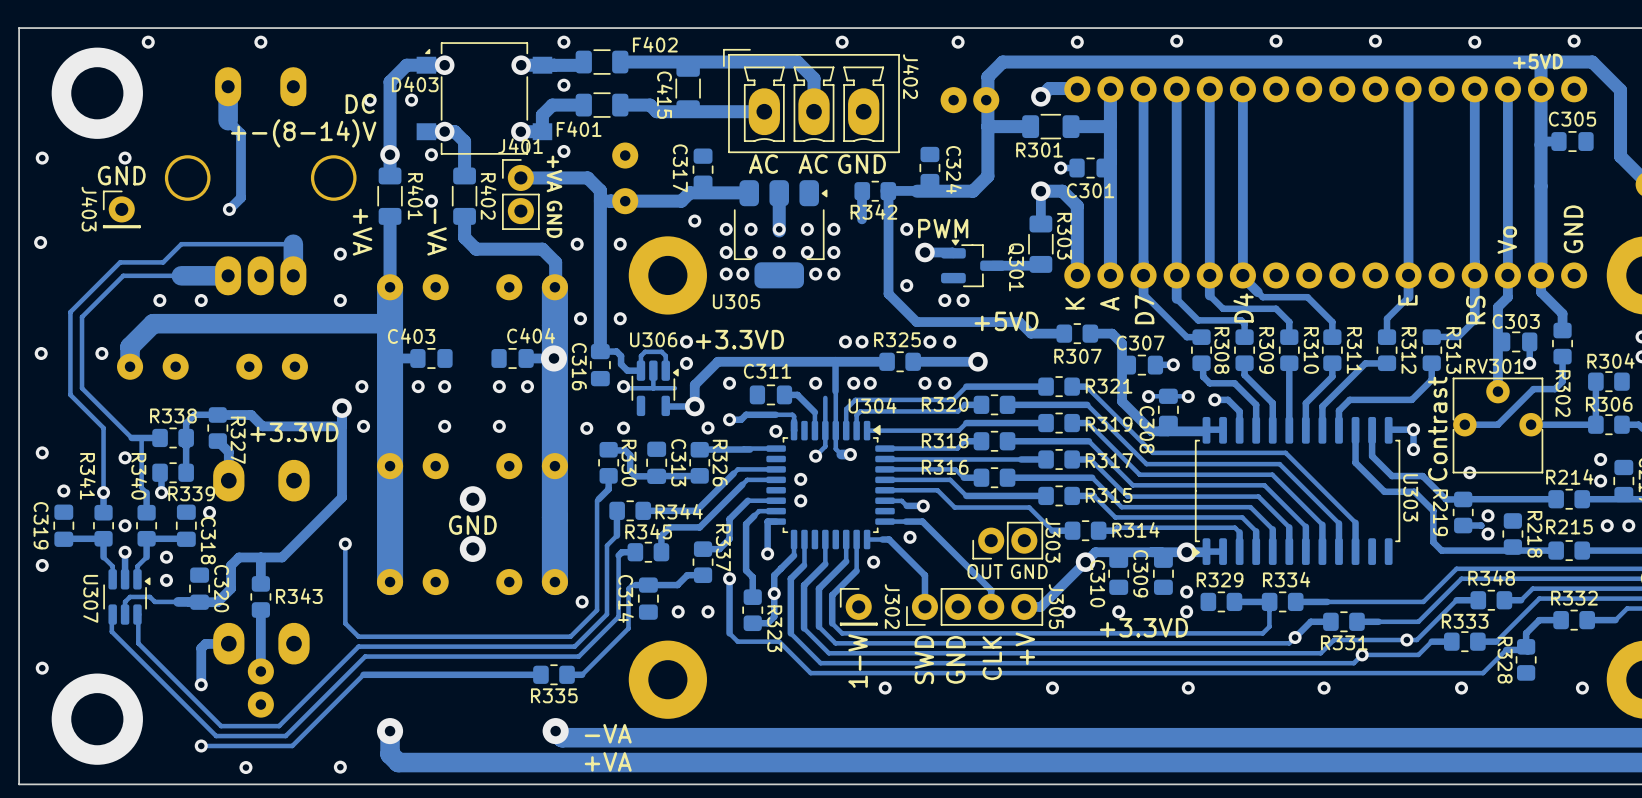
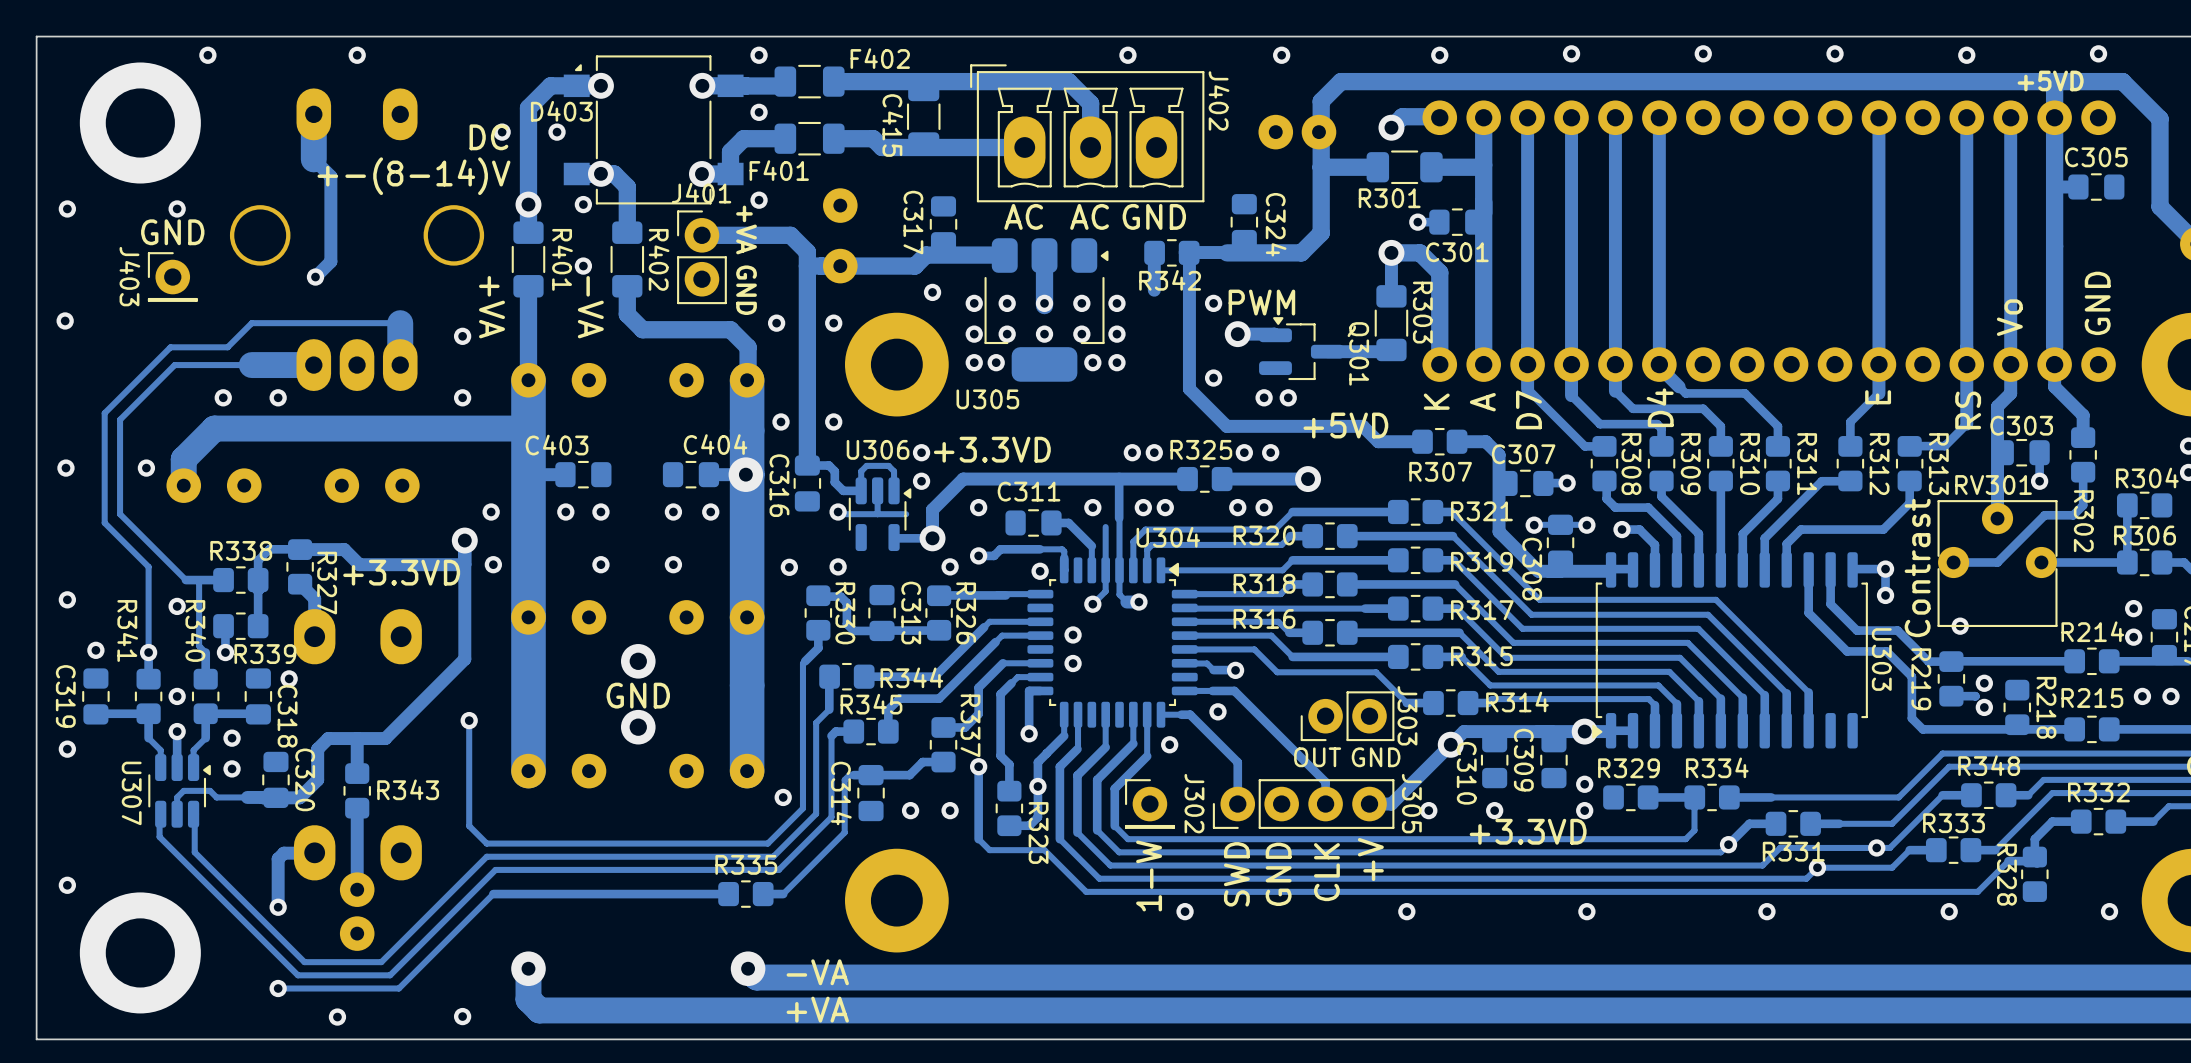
R335 name position: R335 (554, 695) -> R335 (746, 864)

